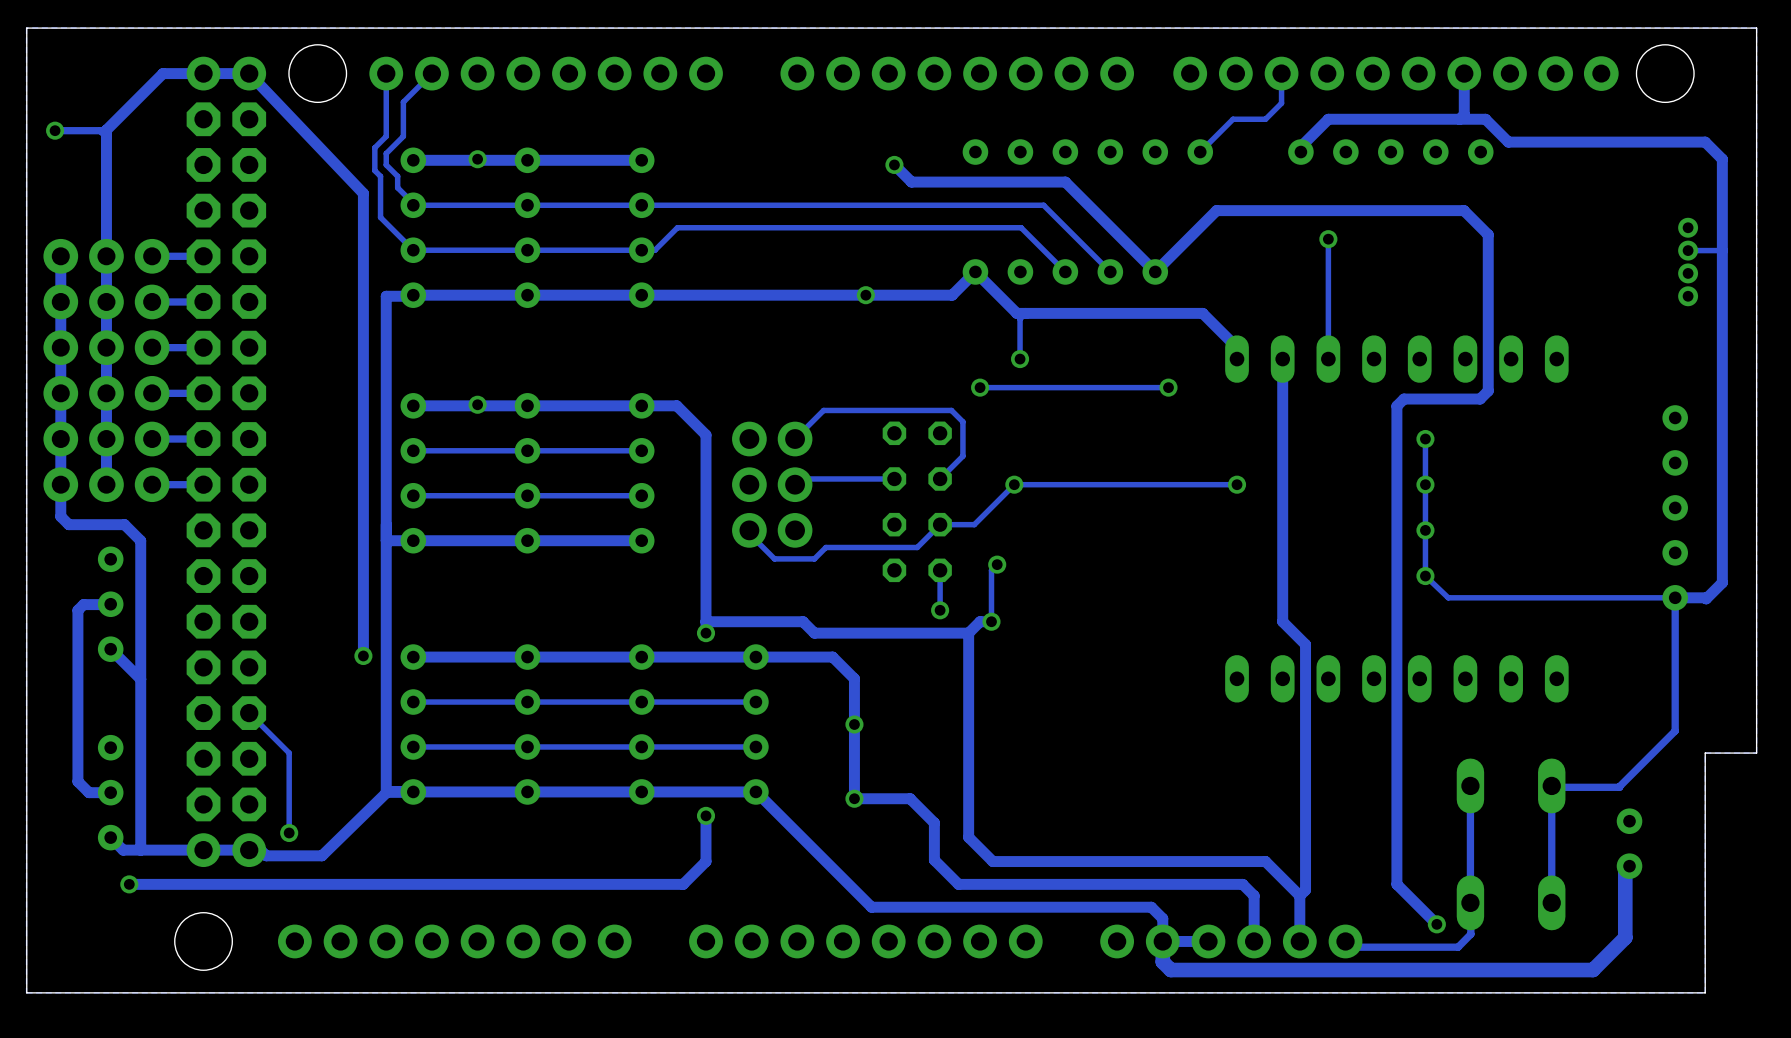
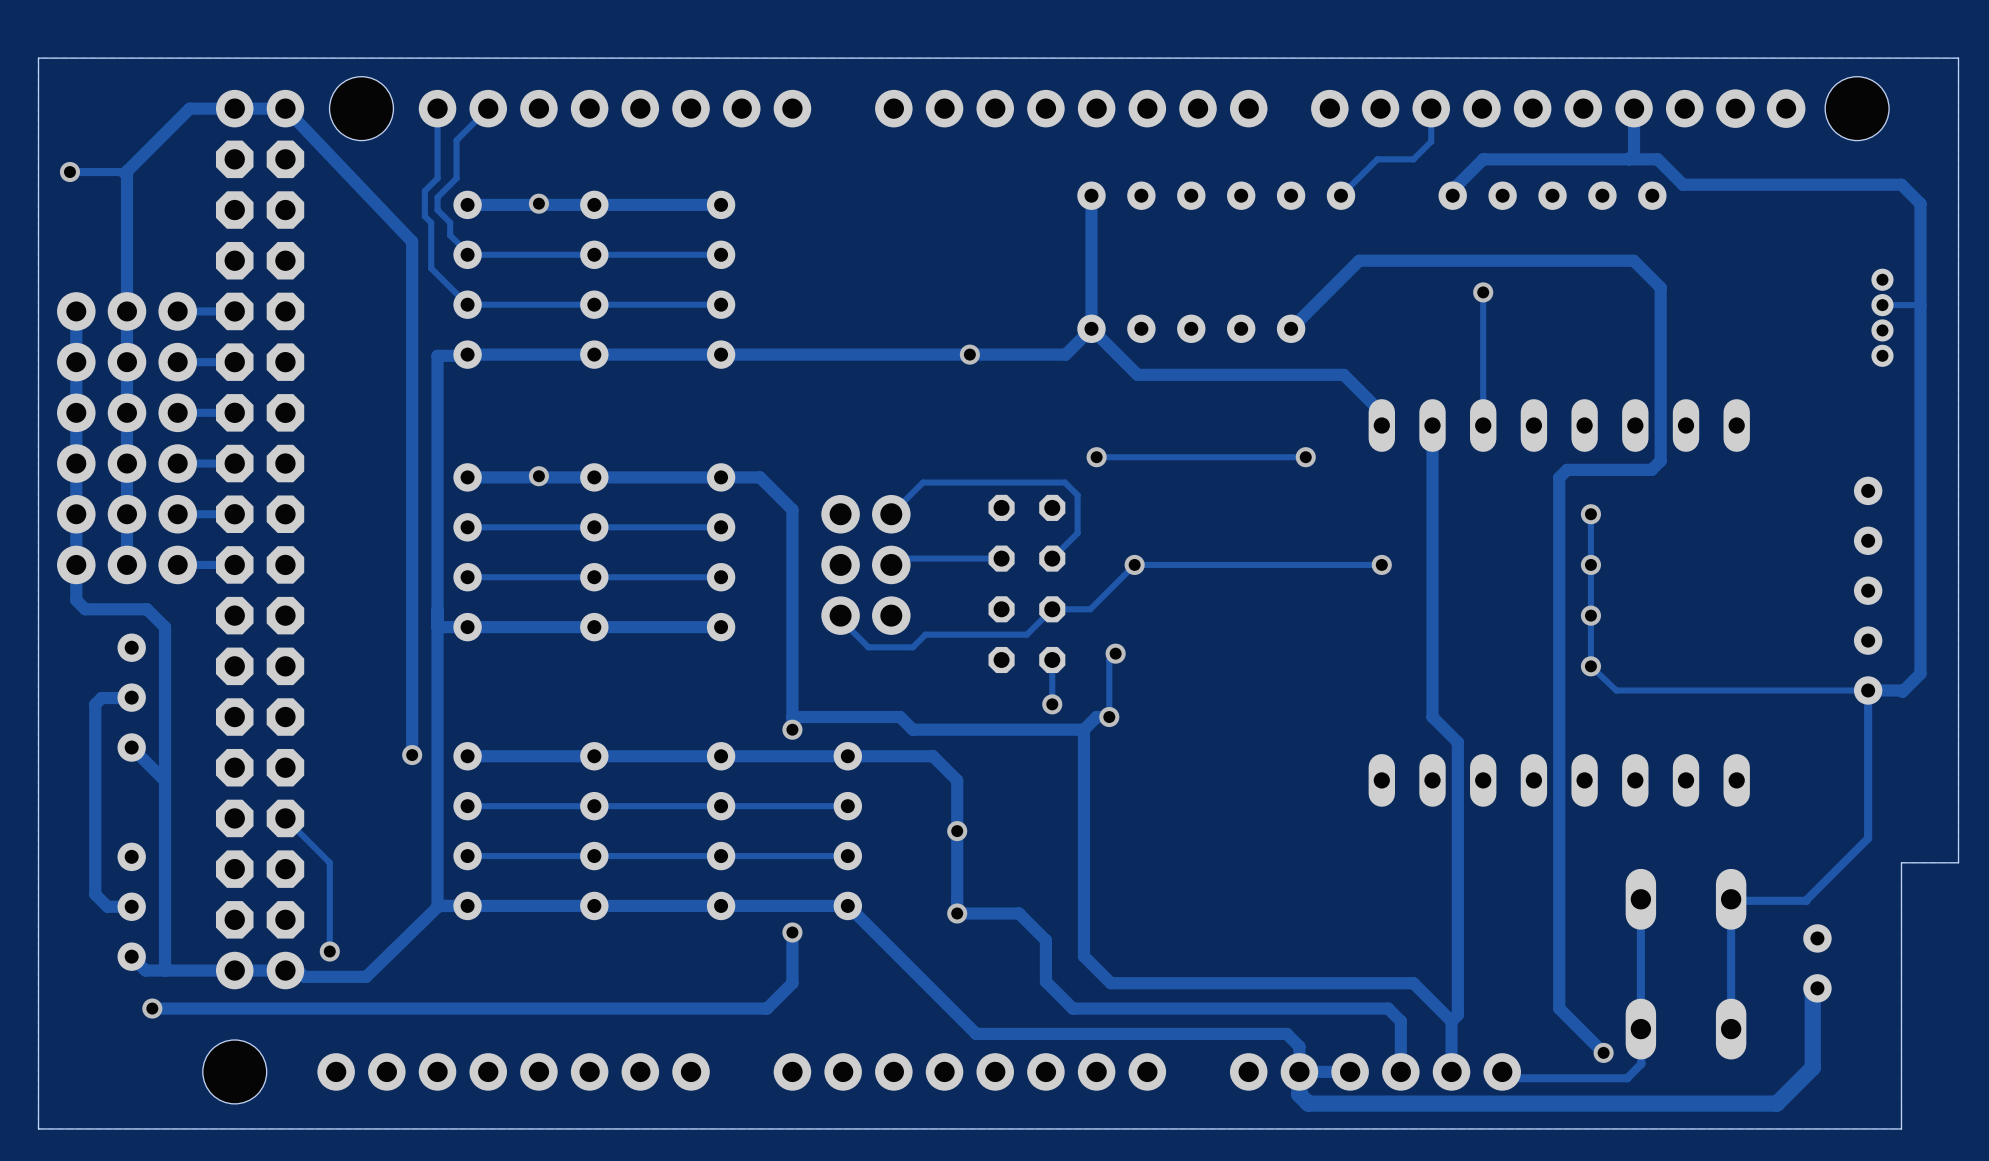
track: none -> (1091, 195) (1091, 328)
track: (894, 164) (911, 182) (1065, 182) (1155, 271) -> none
via: (894, 164) -> none
track: (641, 205) (1043, 205) (1110, 271) -> none
track: (641, 250) (654, 250) (677, 227) (1021, 227) (1065, 271) -> none
track: (1025, 313) (1020, 319) (1020, 359) -> none
via: (1020, 359) -> none

